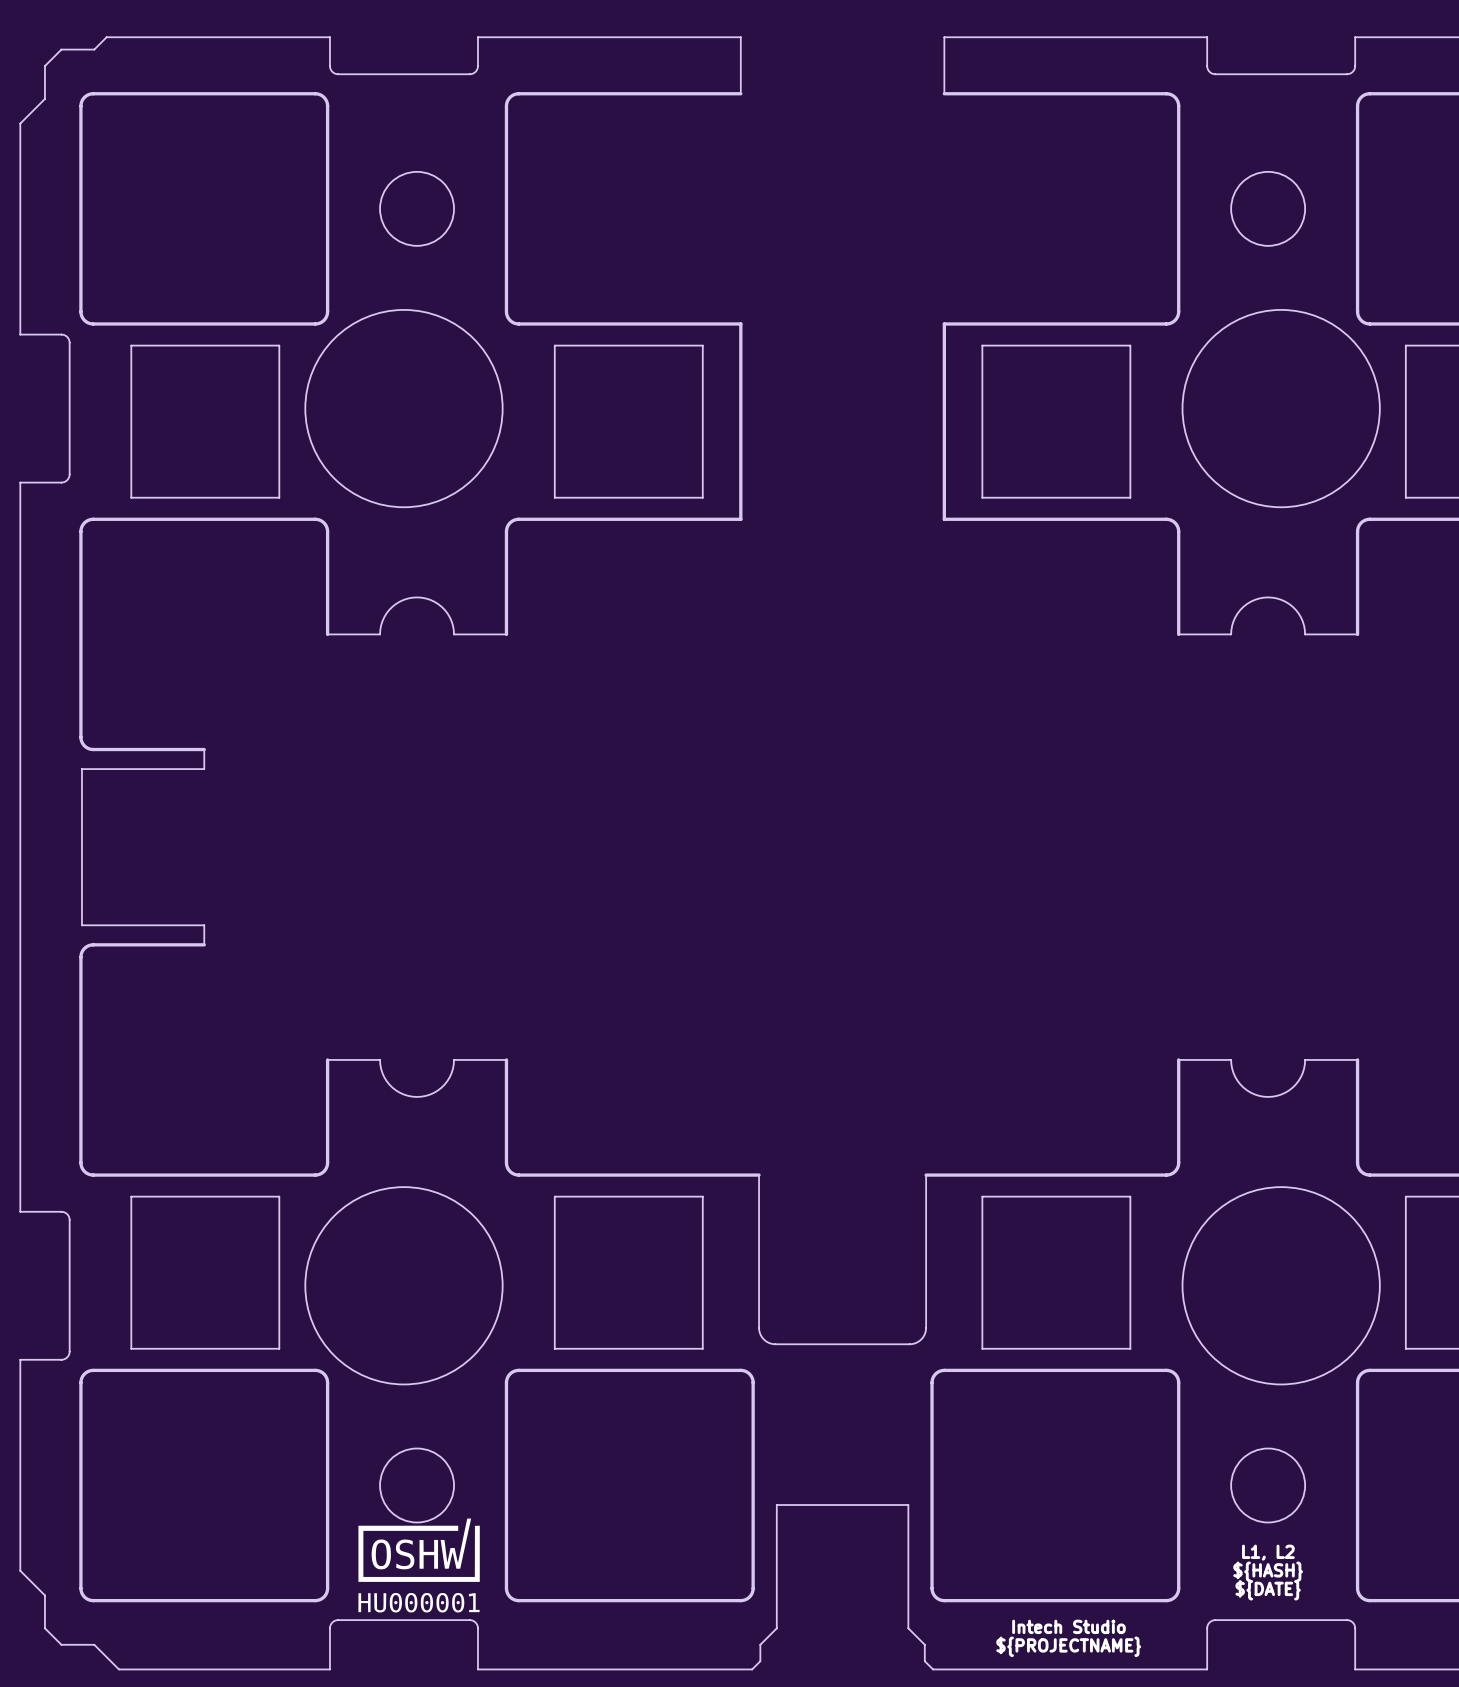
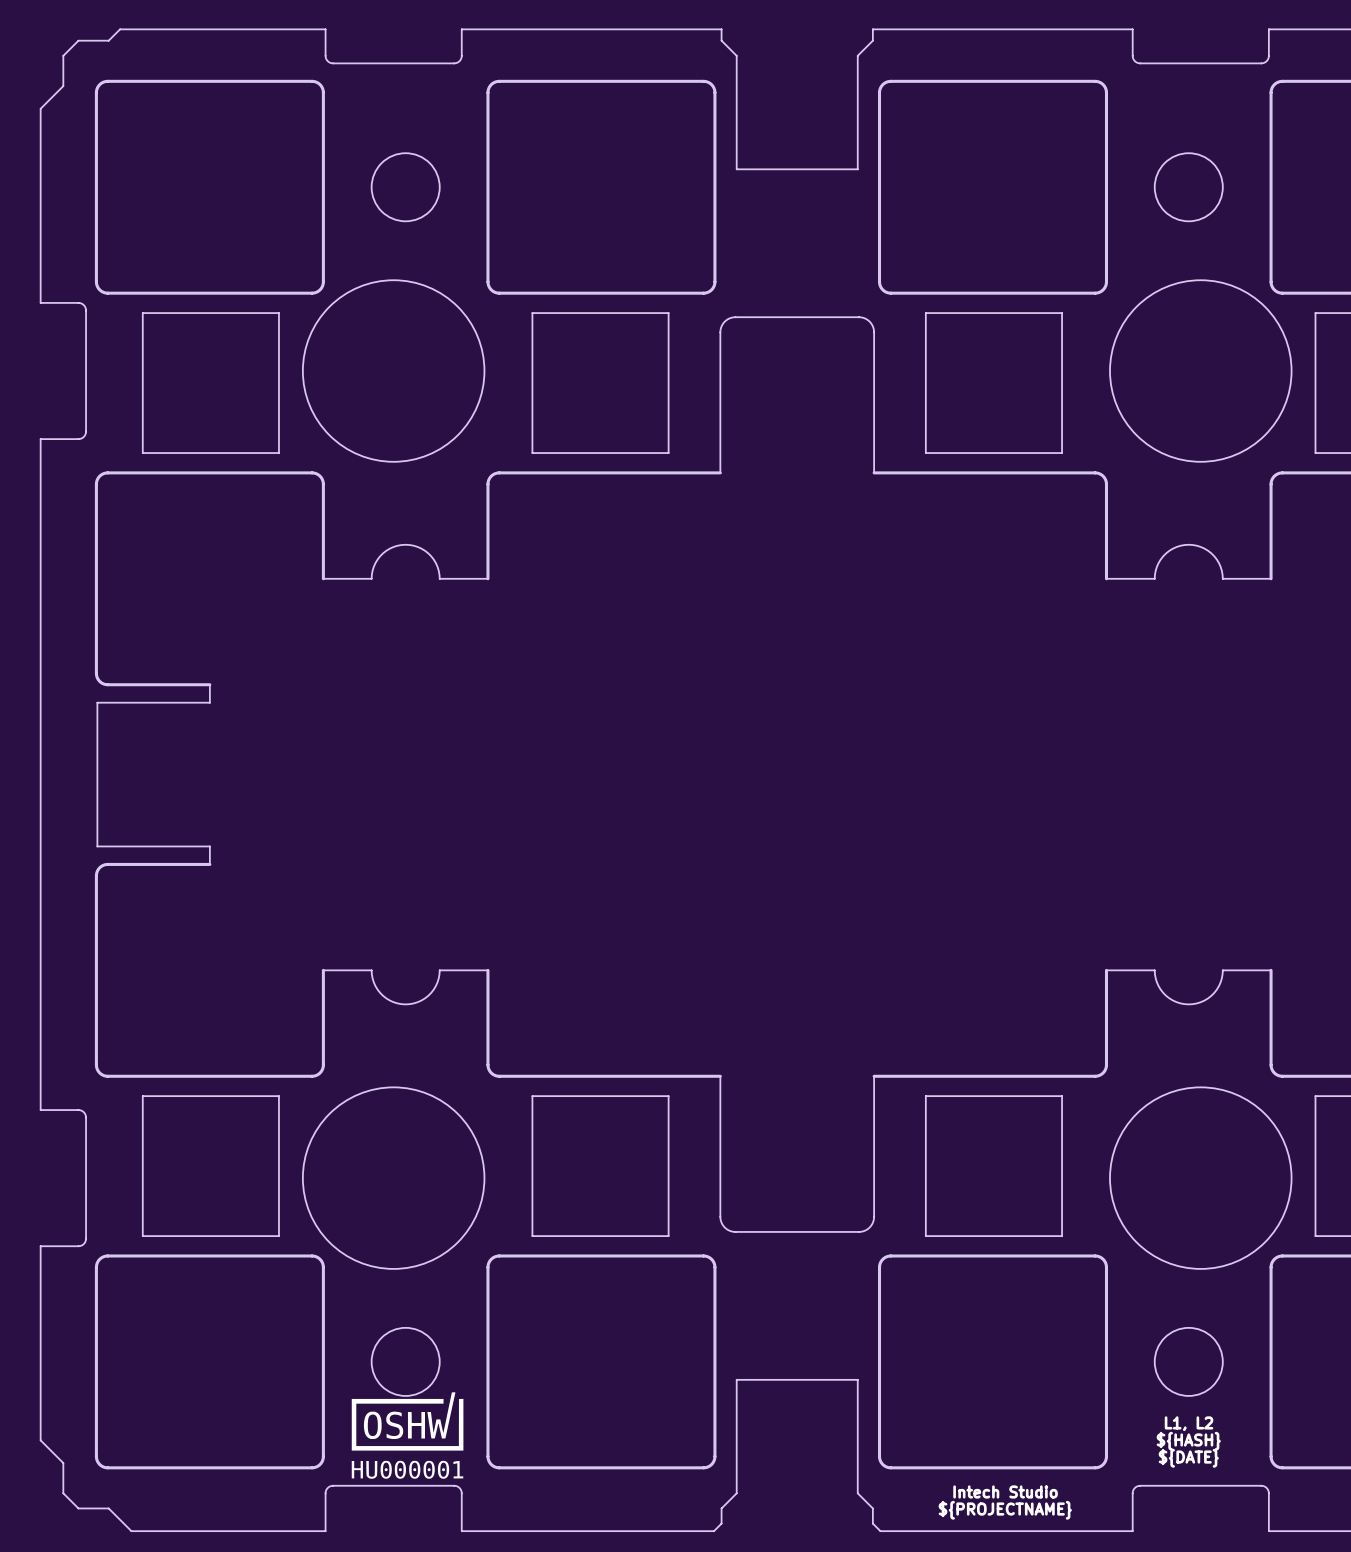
board edge: (740, 37) (740, 93) -> (703, 29) (721, 29) (721, 40) (736, 55) (736, 169) (857, 169) (857, 55) (872, 40) (872, 29) (890, 29)
board edge: (944, 37) (944, 93) -> (890, 293) (882, 289) (879, 281) (879, 91) (883, 83) (890, 81)
board edge: none -> (703, 81) (711, 84) (714, 92) (714, 283) (711, 289) (703, 293)
board edge: (740, 323) (740, 519) -> (890, 472) (874, 472) (874, 330) (869, 321) (858, 317) (735, 317) (724, 321) (720, 332) (720, 472) (703, 472)
board edge: (944, 323) (944, 519) -> none

